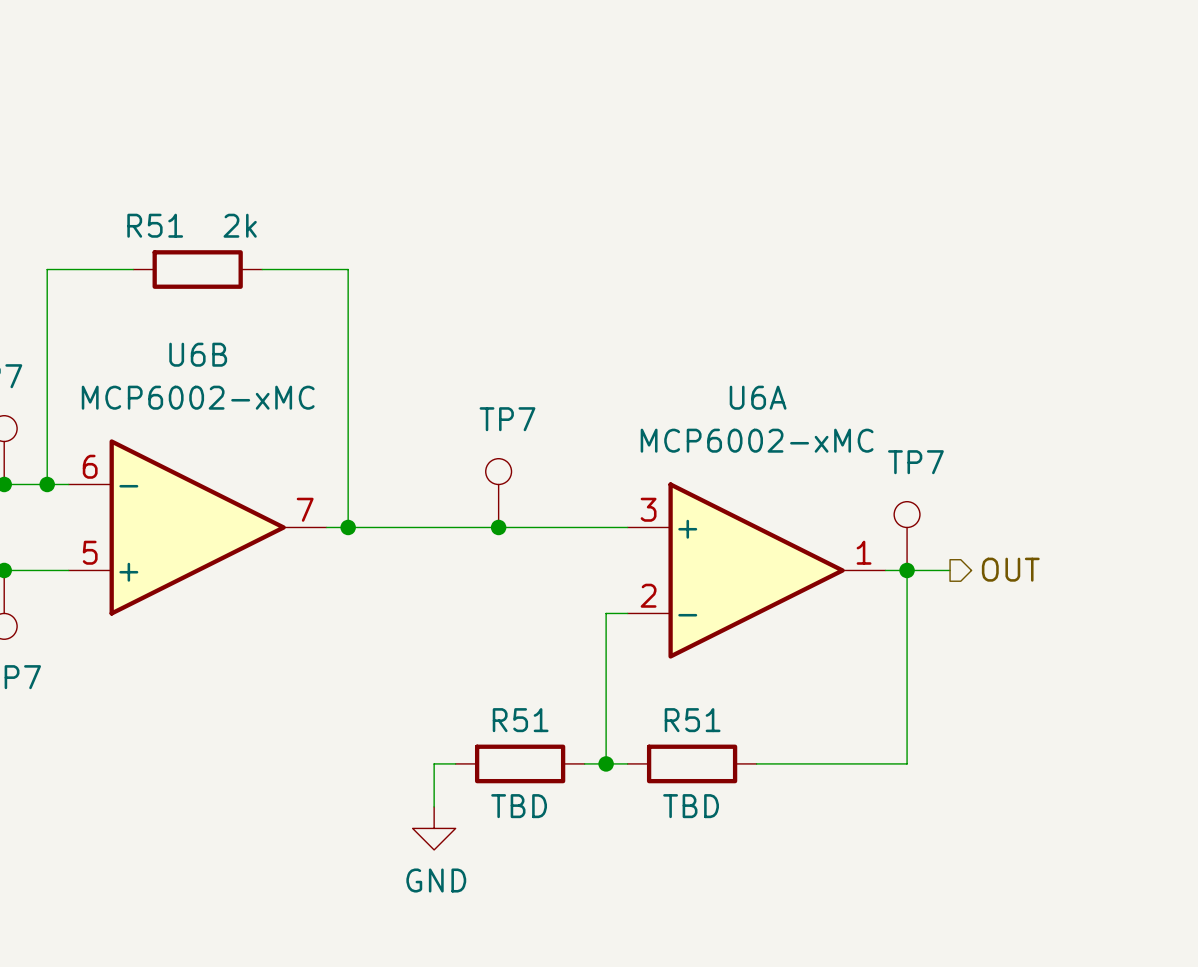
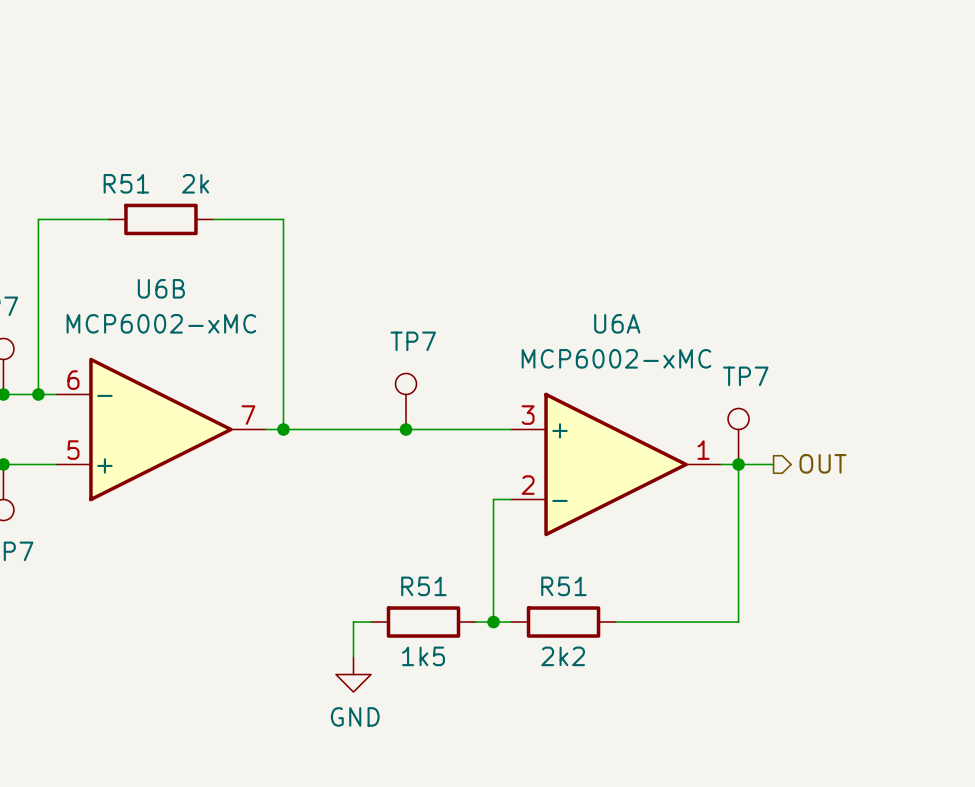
R51 value: TBD (519, 806) -> 1k5 (423, 656)
R51 value: TBD (691, 806) -> 2k2 (563, 656)

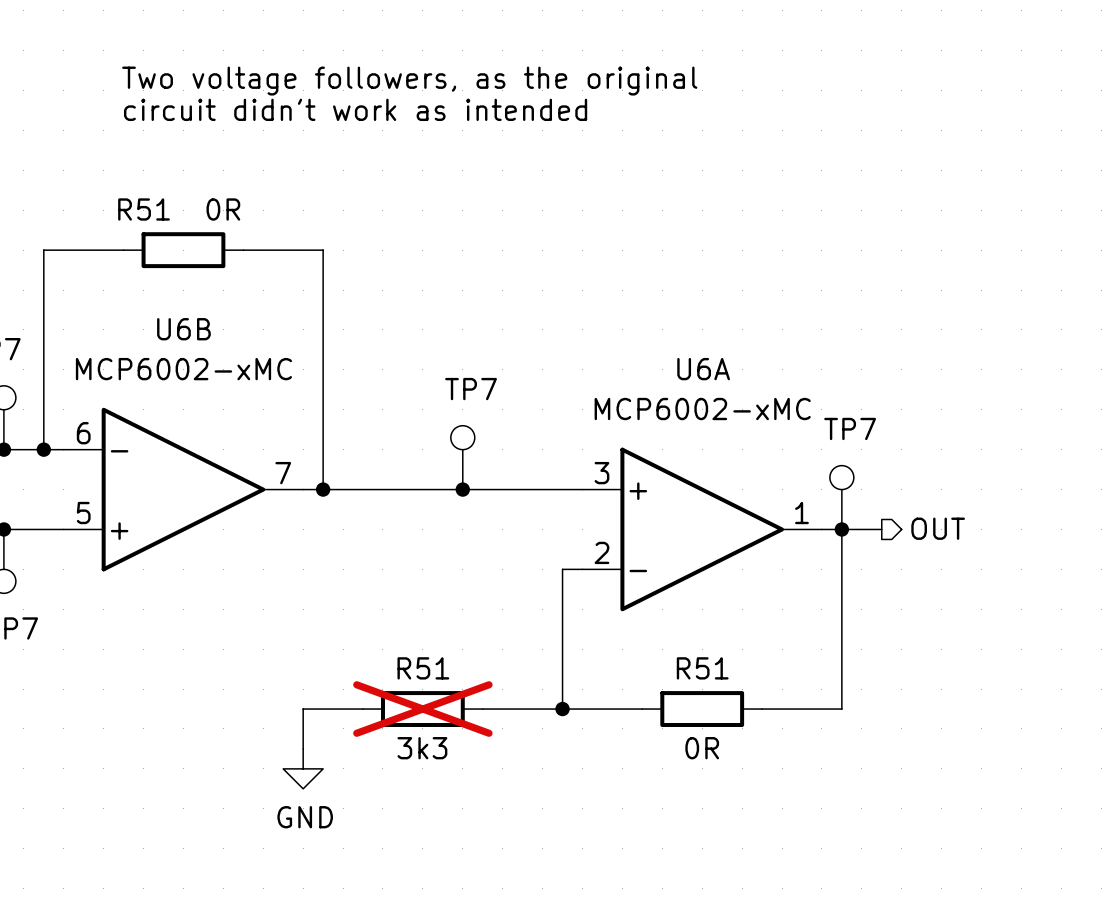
text: none -> Two voltage followers, as the original (409, 81)
text: none -> circuit didn't work as intended (355, 109)
R51 value: 2k (195, 183) -> 0R (223, 209)
wire: none -> (363, 709) (303, 709) (303, 748)
wire: (370, 622) (353, 622) (353, 657) -> none
R51: none -> 3k3 (422, 709)
wire: none -> (482, 709) (542, 709)
R51: 1k5 (423, 622) -> none
R51: 2k2 (563, 622) -> none
wire: (616, 622) (668, 622) -> (582, 709) (642, 709)
R51: none -> 0R (702, 709)
power symbol position: GND (353, 674) -> GND (303, 768)

